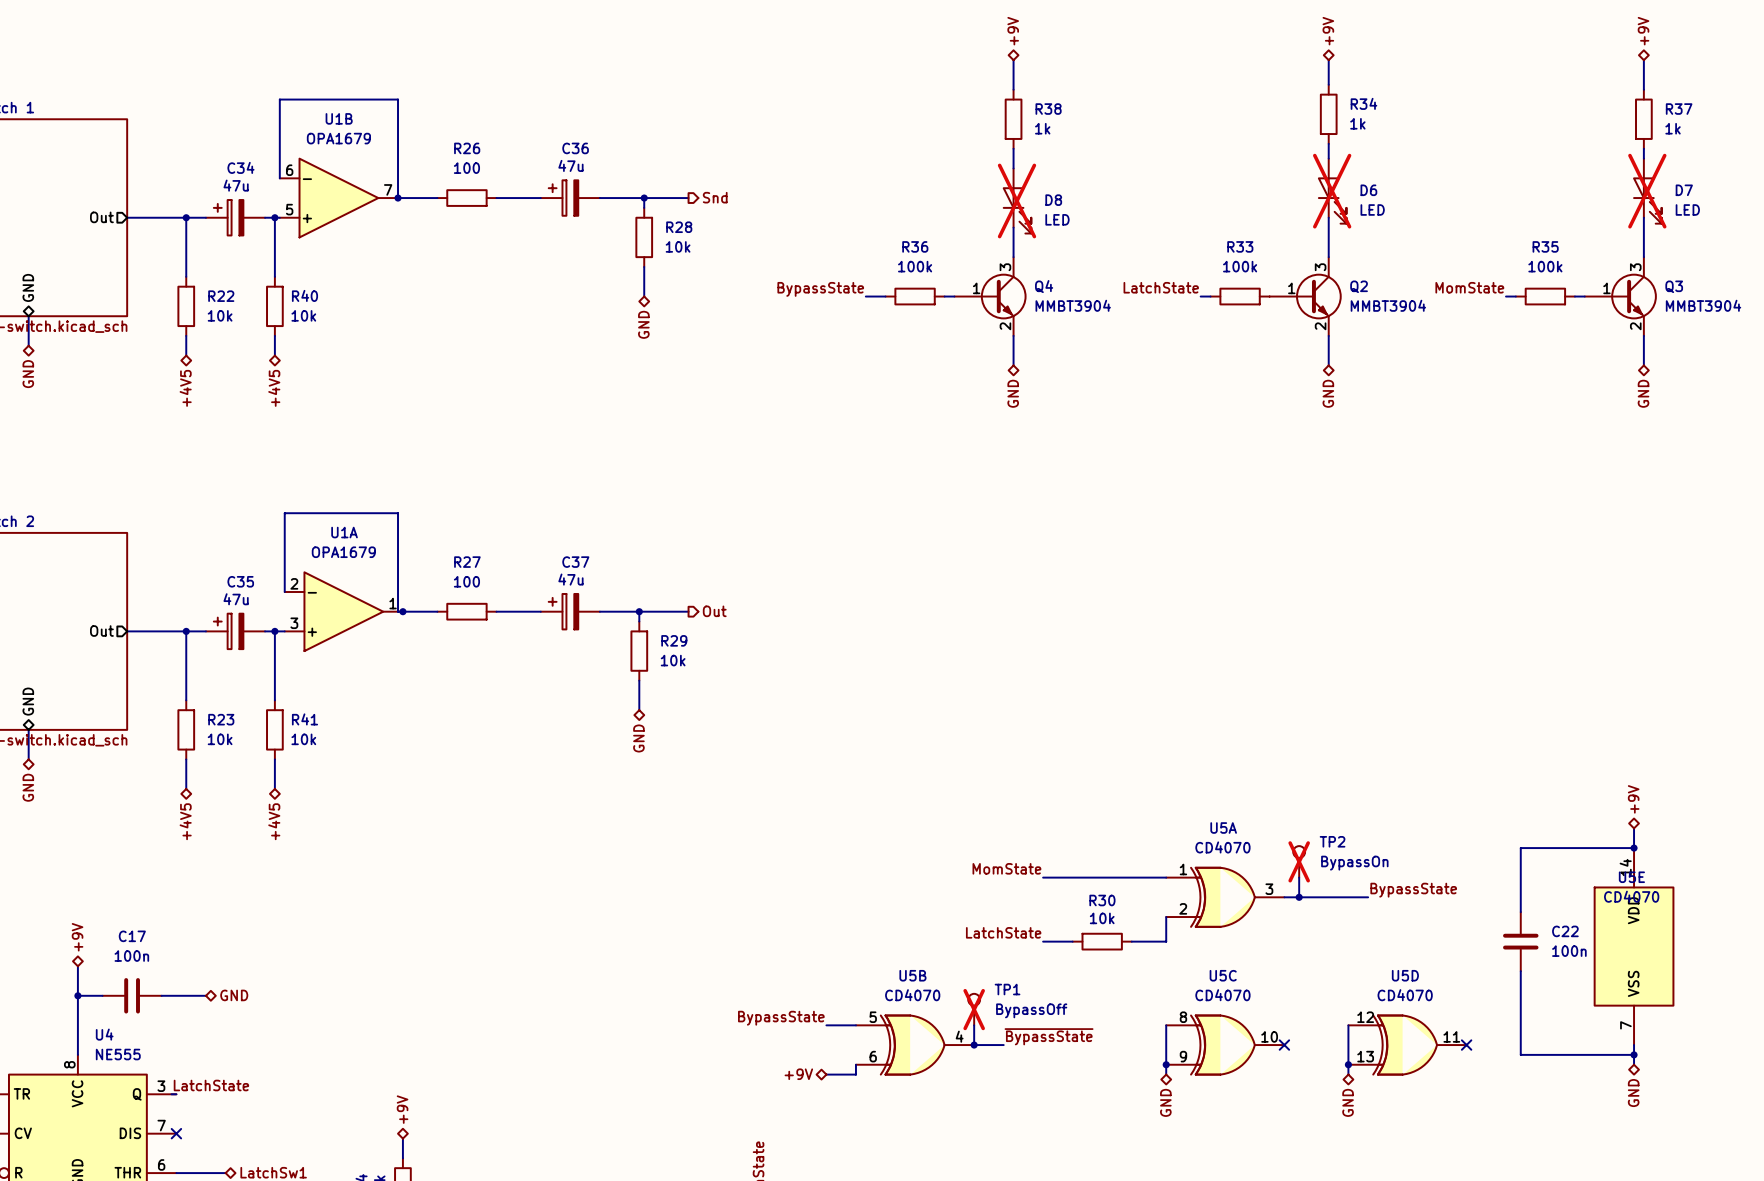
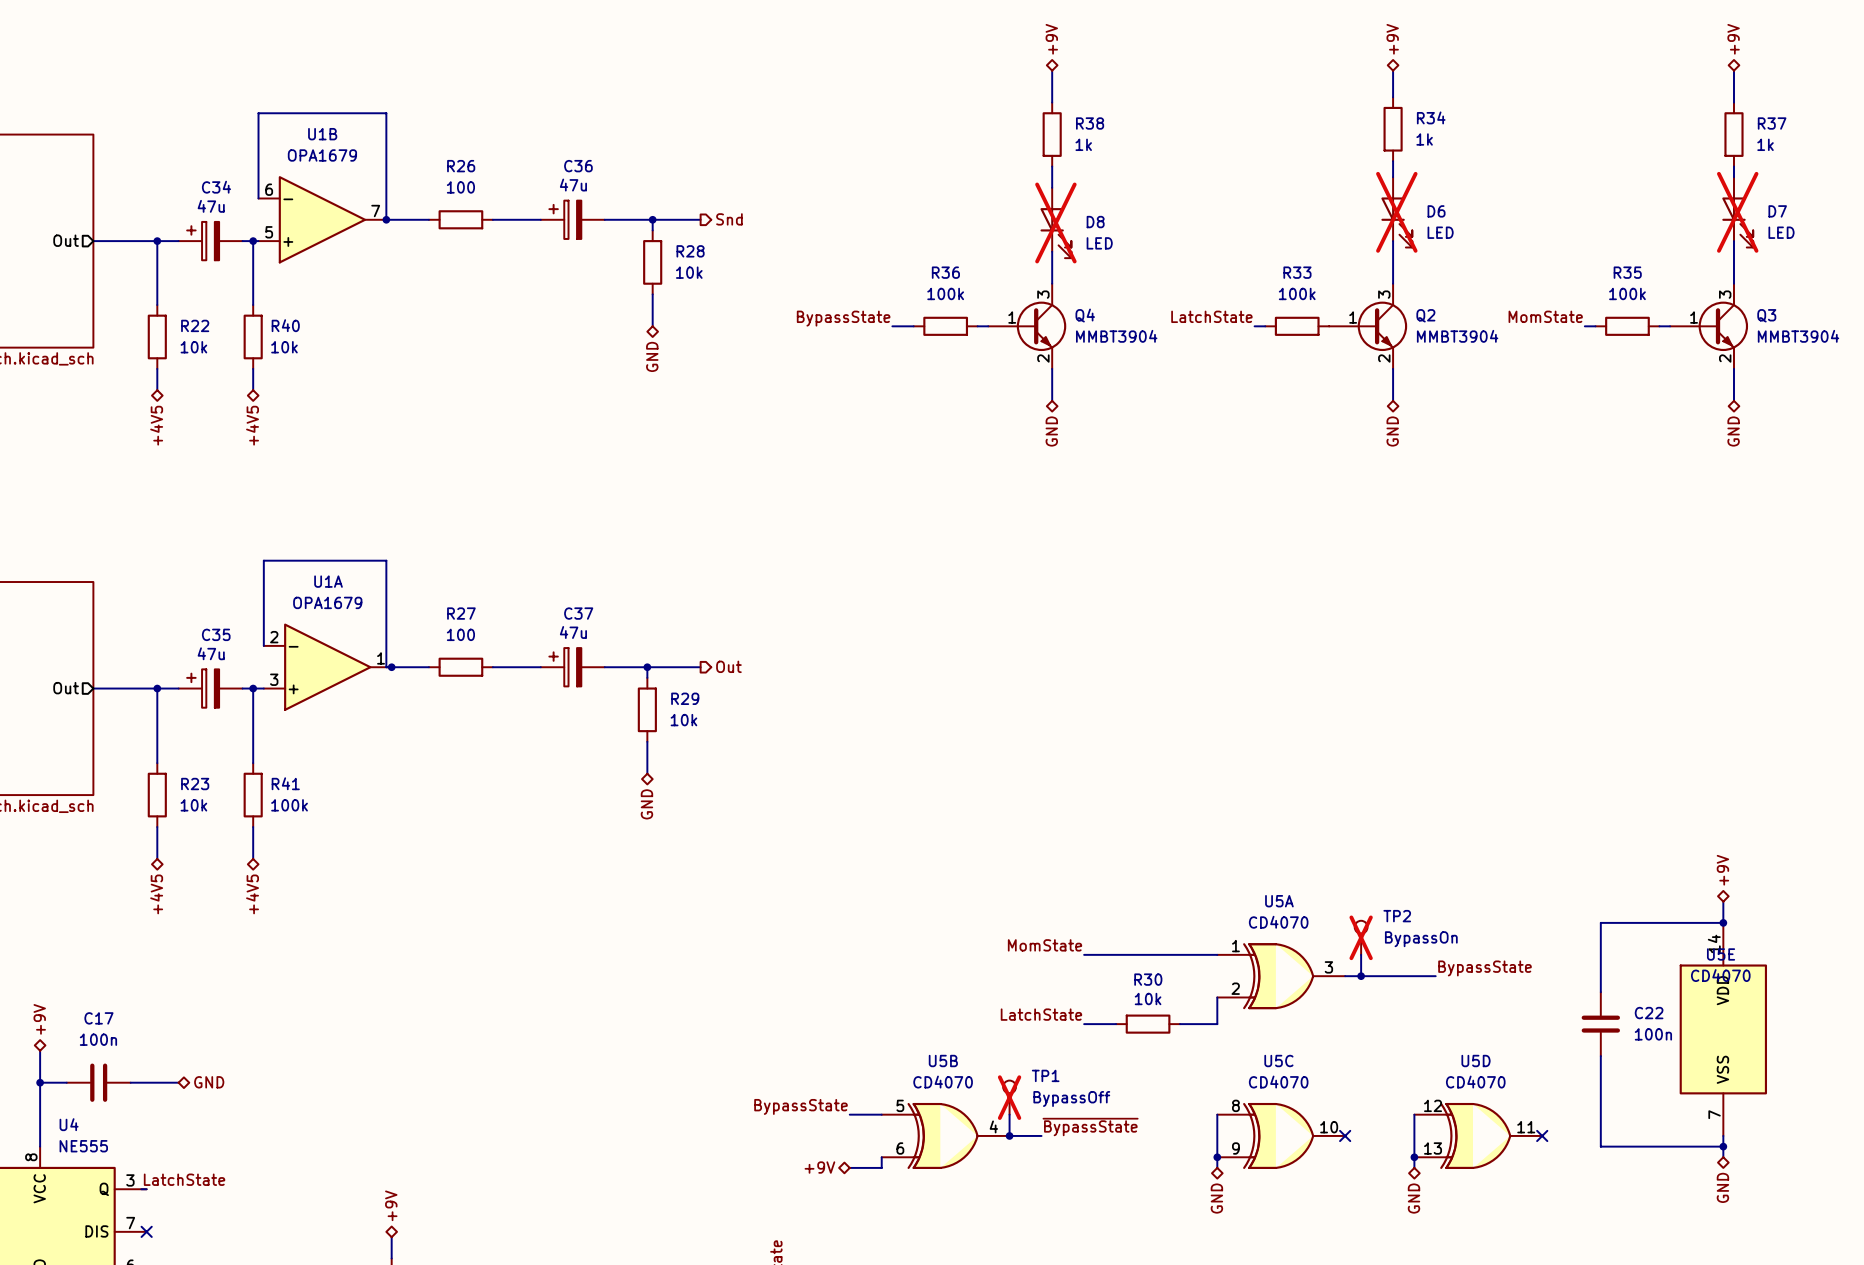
R41 value: 10k (303, 739) -> 100k (289, 805)

